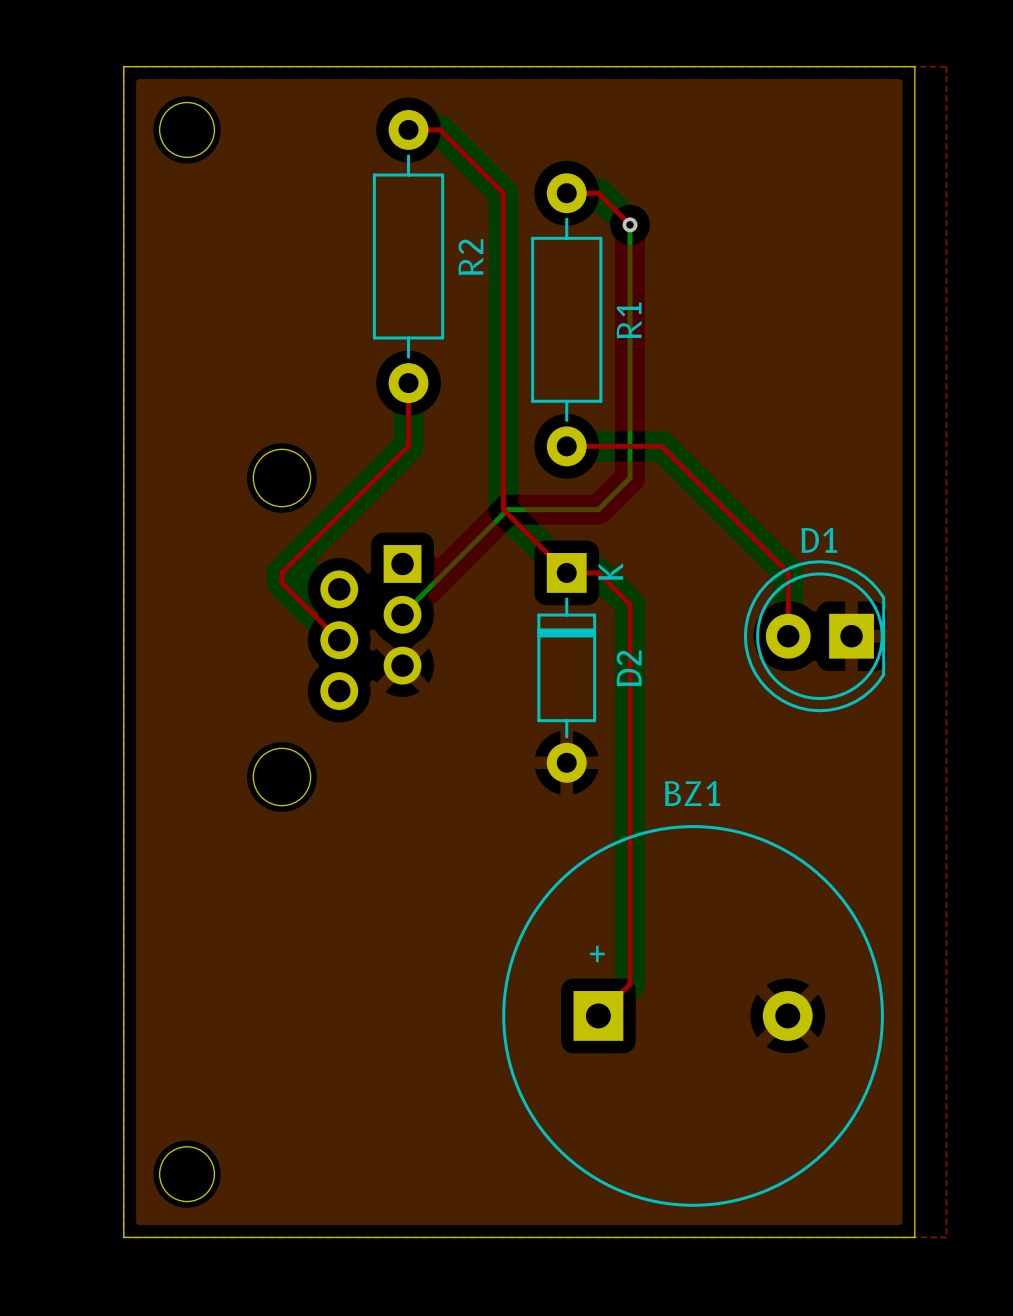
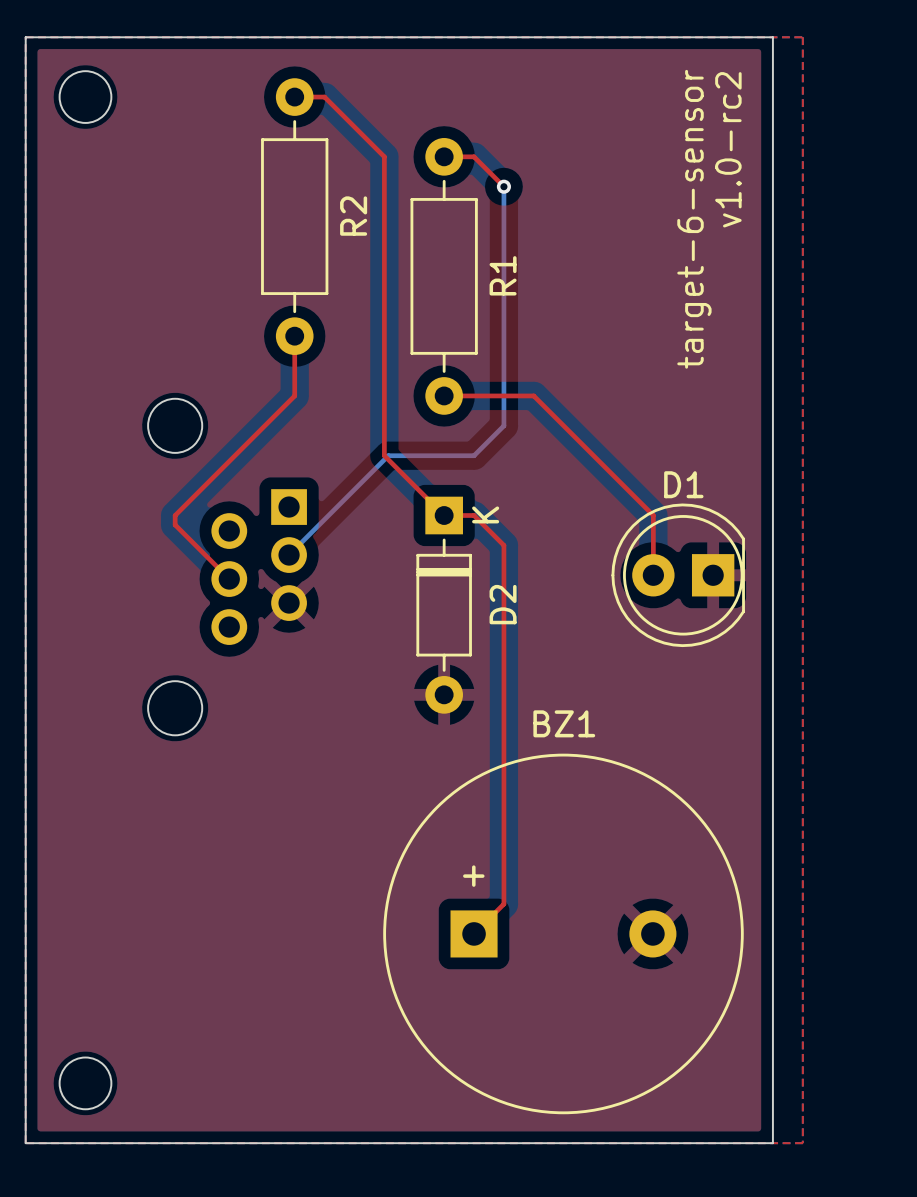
text: none -> v1.0-rc2 (728, 149)
text: none -> target-6-sensor (694, 219)

